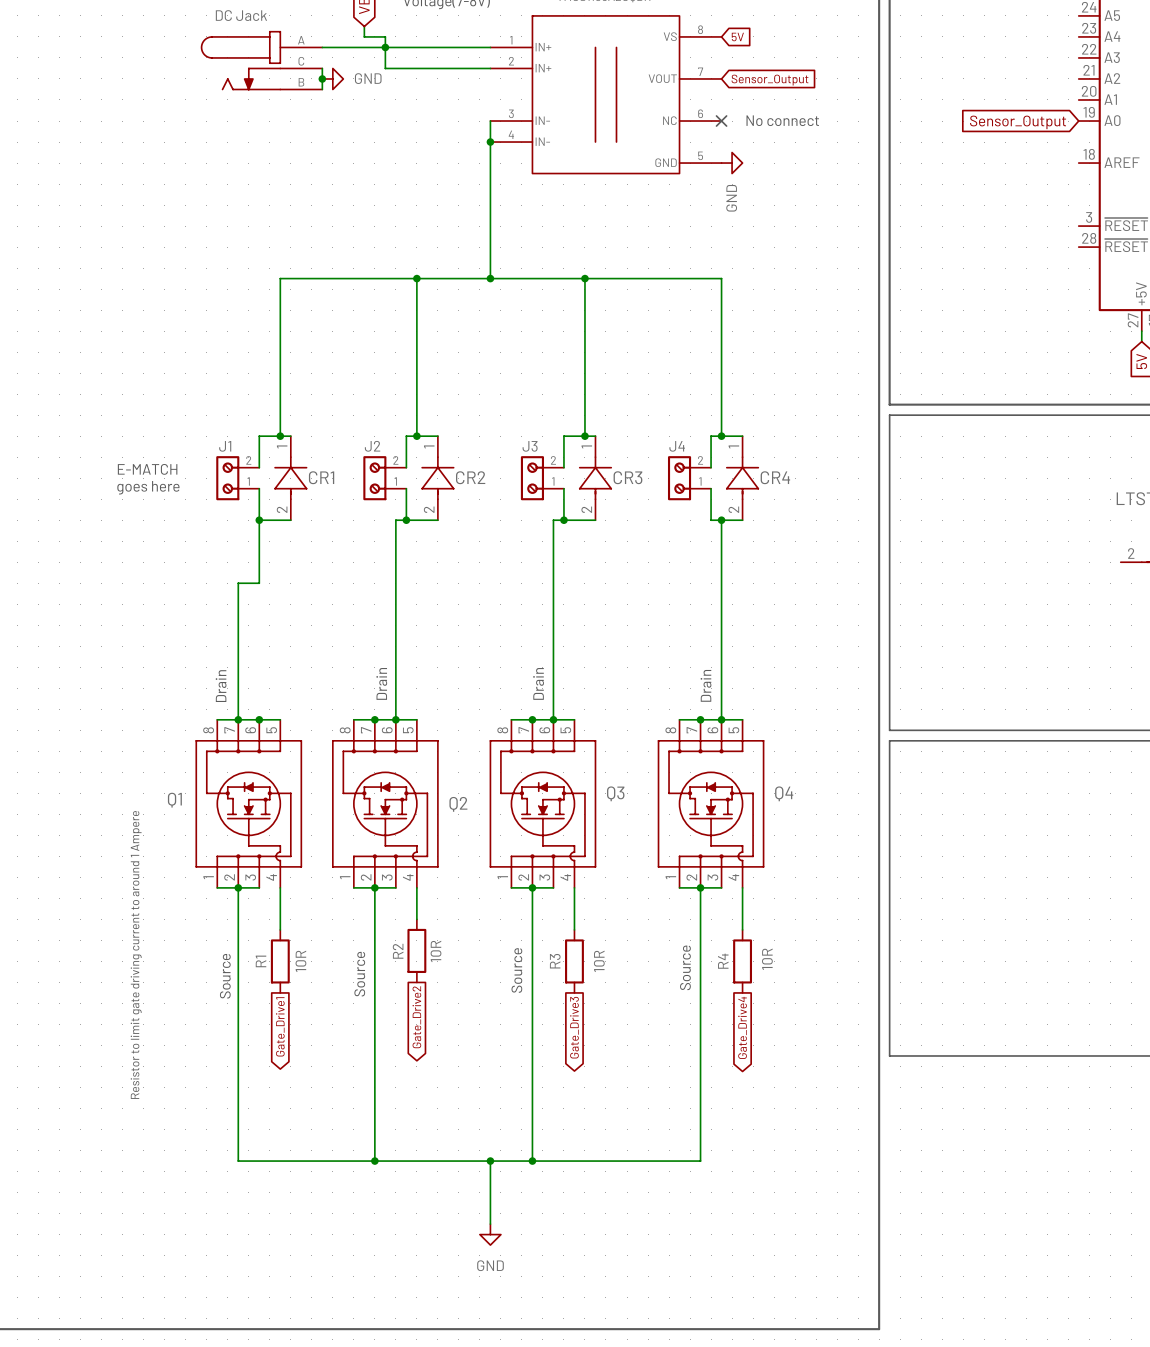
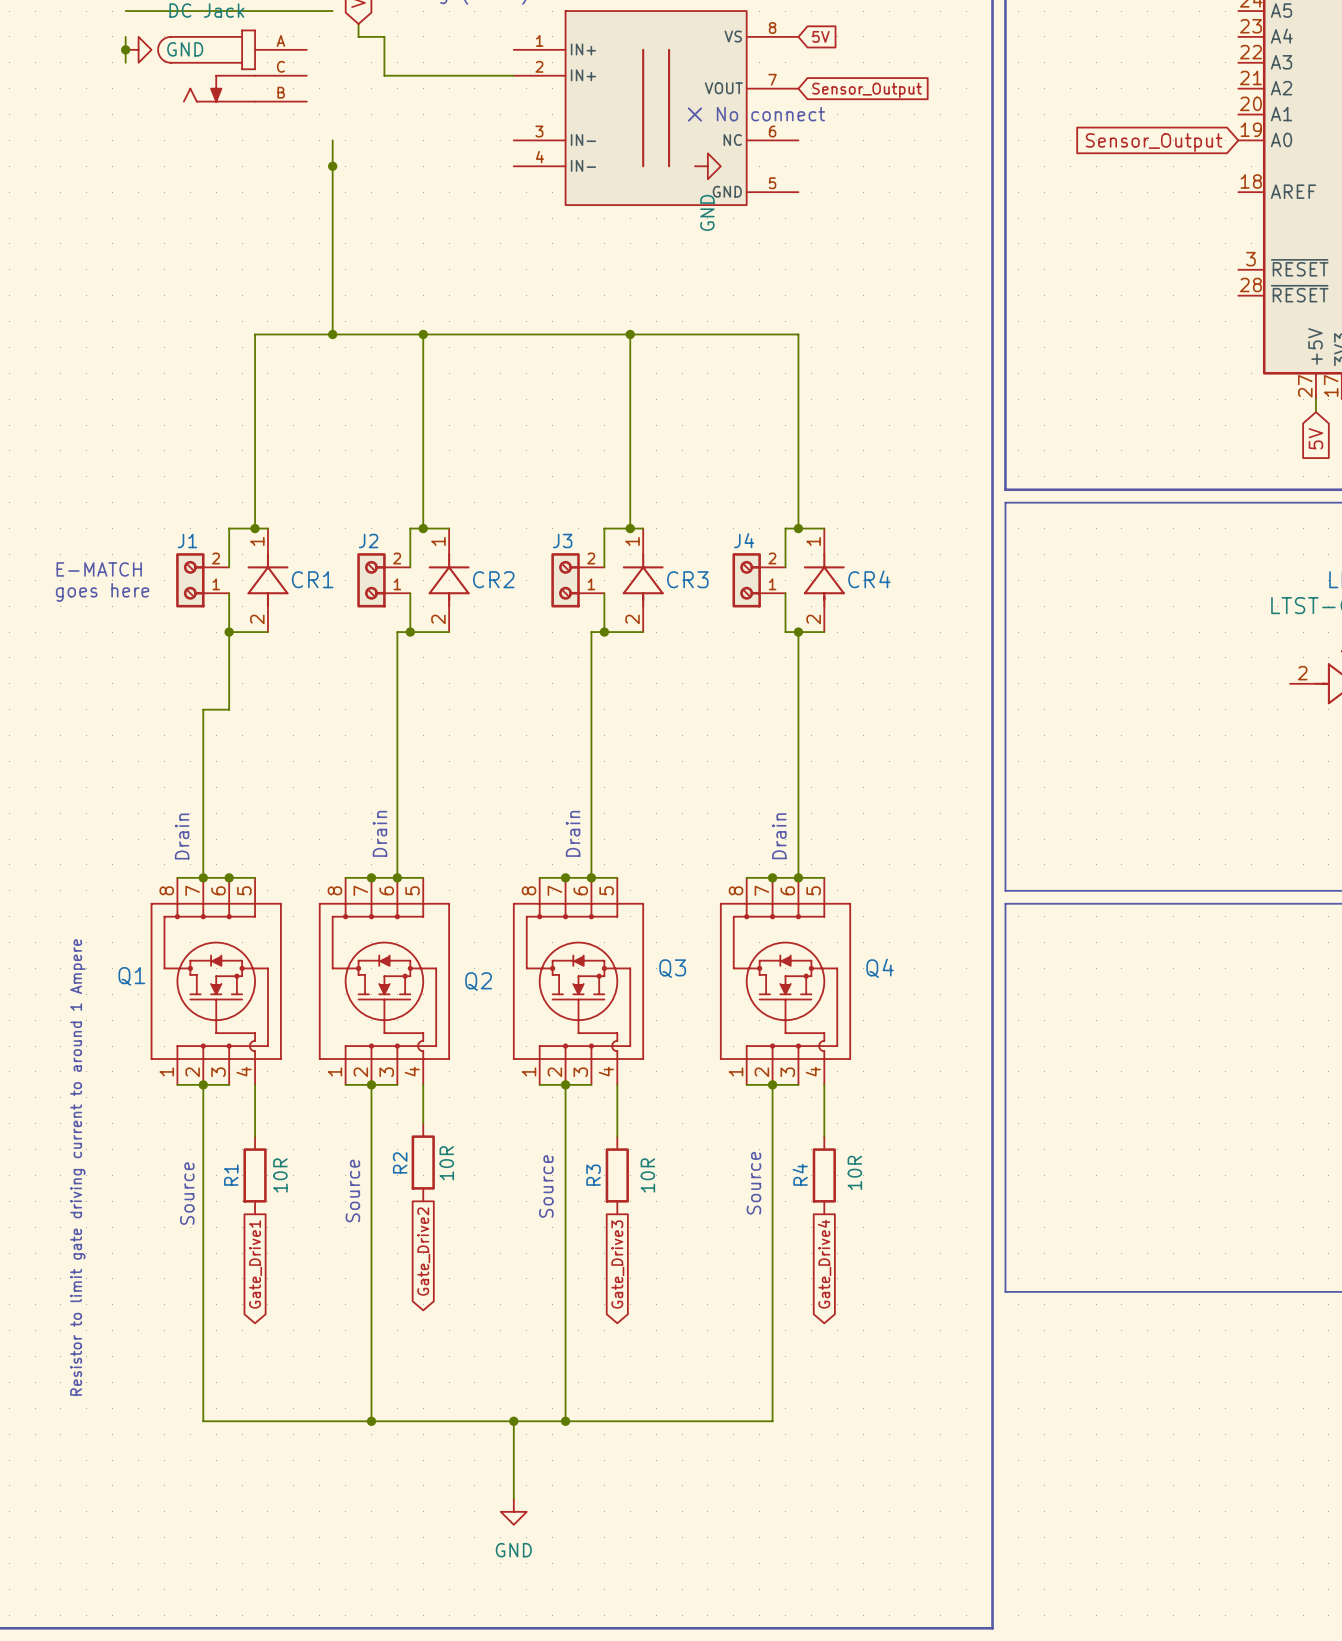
junction: none -> (125, 49)
wire: (322, 47) (490, 47) -> (125, 11) (332, 11)
junction: (385, 47) -> none
wire: (322, 68) (322, 89) -> (125, 36) (125, 62)
junction: (322, 78) -> none
power symbol position: GND (332, 78) -> GND (138, 49)
no-connect mark: none -> (694, 114)
text position: No connect (782, 120) -> No connect (770, 114)
wire: (490, 121) (490, 278) -> (332, 140) (332, 334)
no-connect mark: (721, 121) -> none
junction: none -> (332, 166)
junction: (490, 142) -> none
power symbol position: GND (732, 163) -> GND (707, 166)
junction: none -> (332, 334)
junction: (490, 278) -> none

